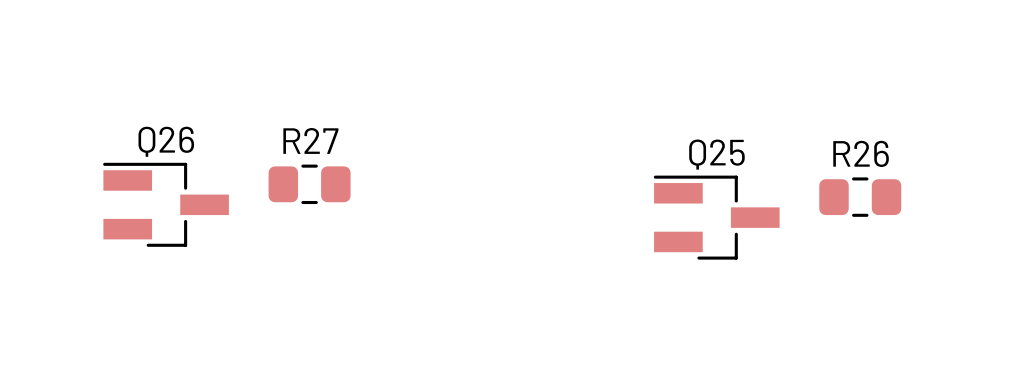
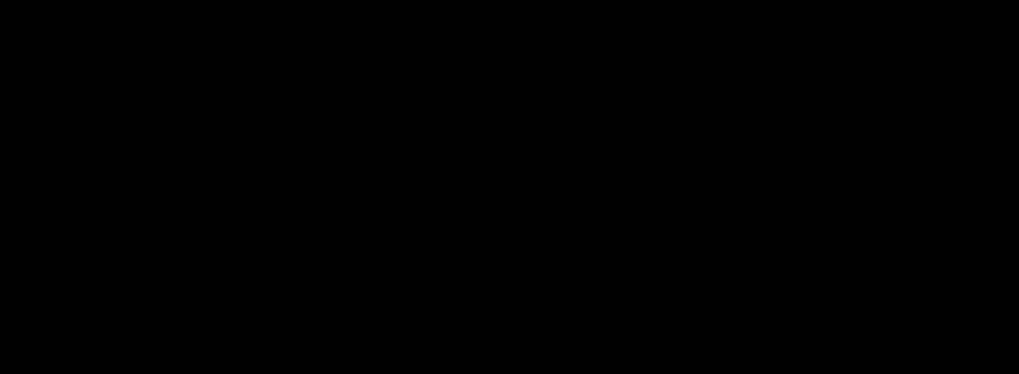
R27: (309, 184) -> none
R26: (860, 197) -> none
Q26: (166, 204) -> none
Q25: (716, 217) -> none

